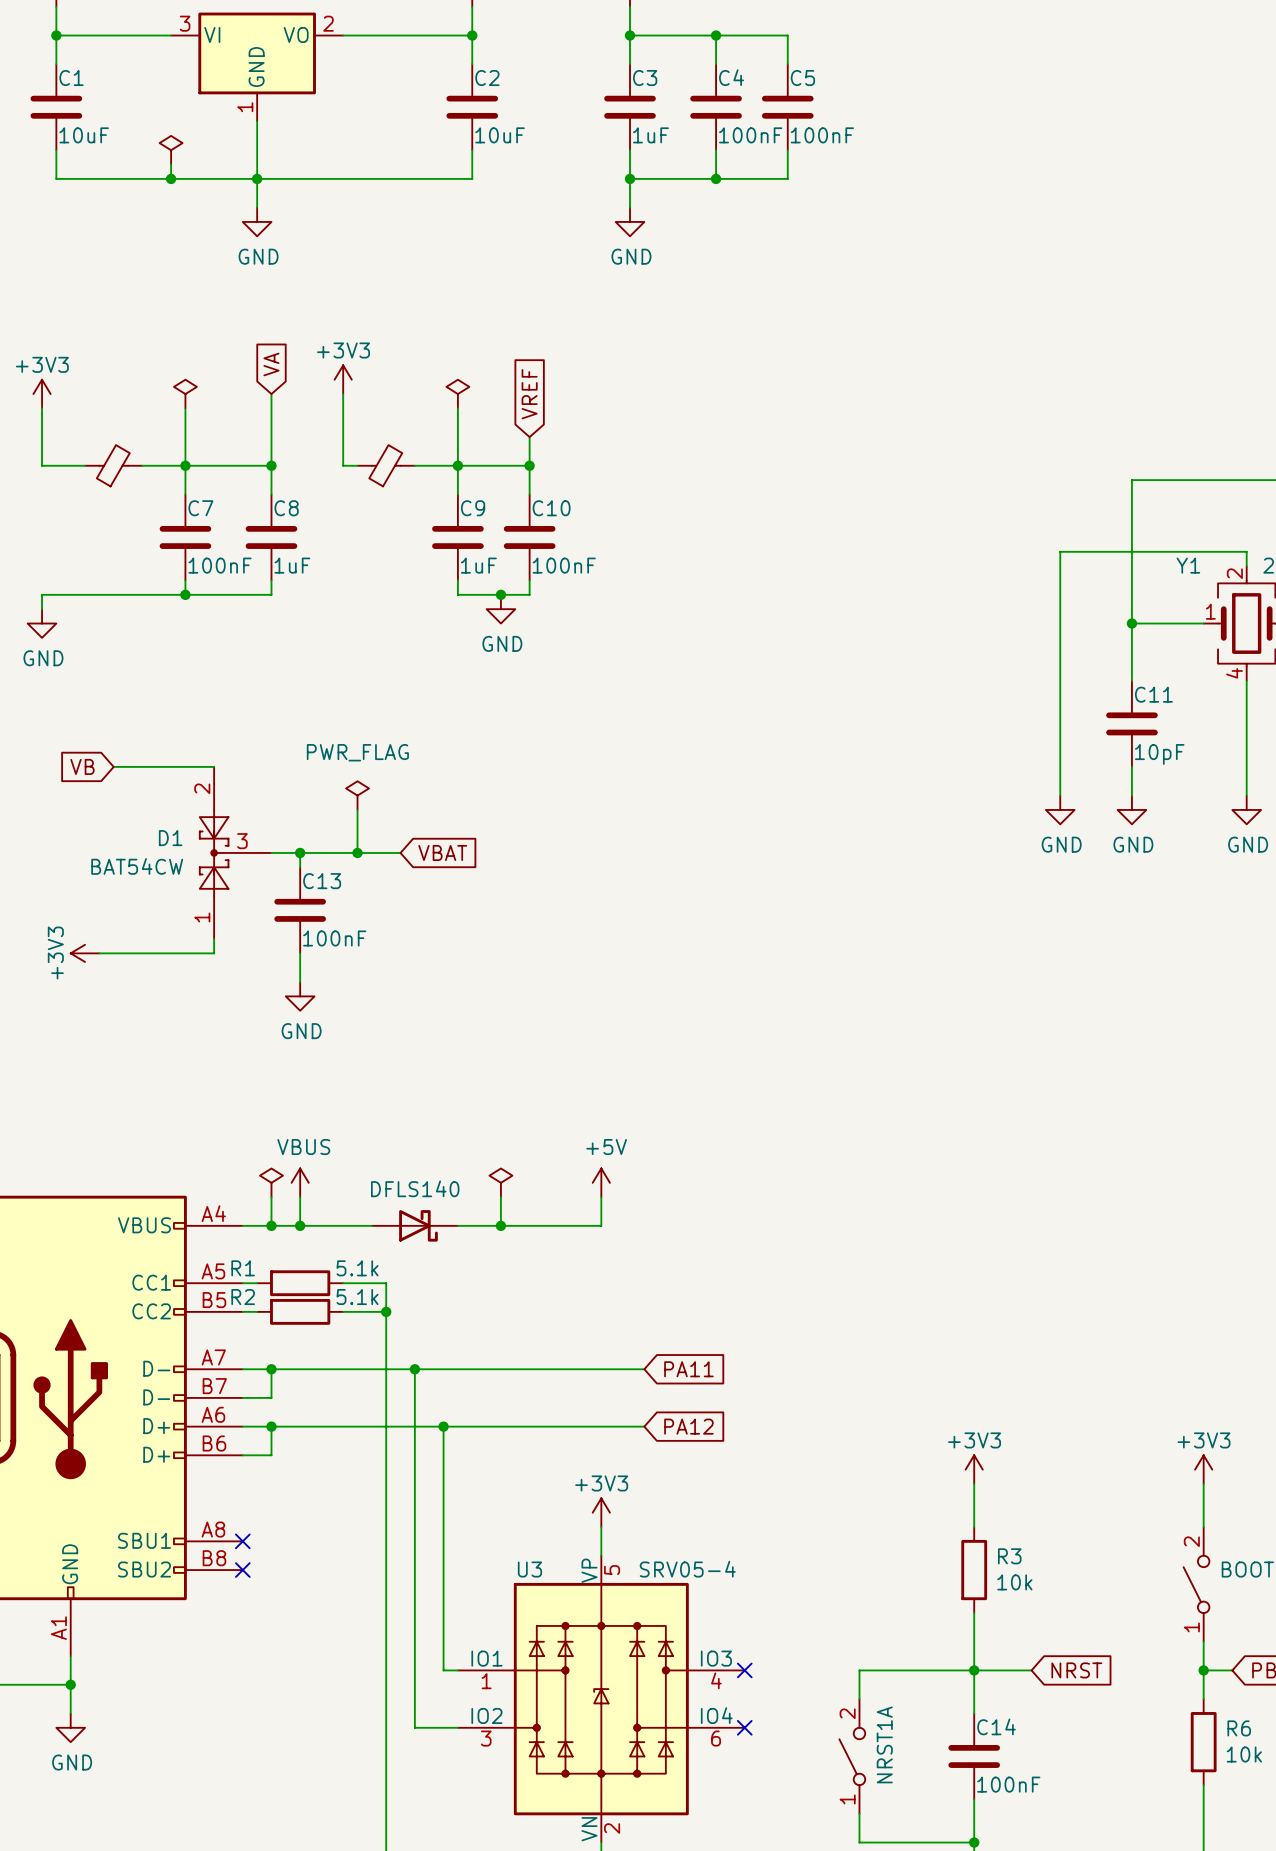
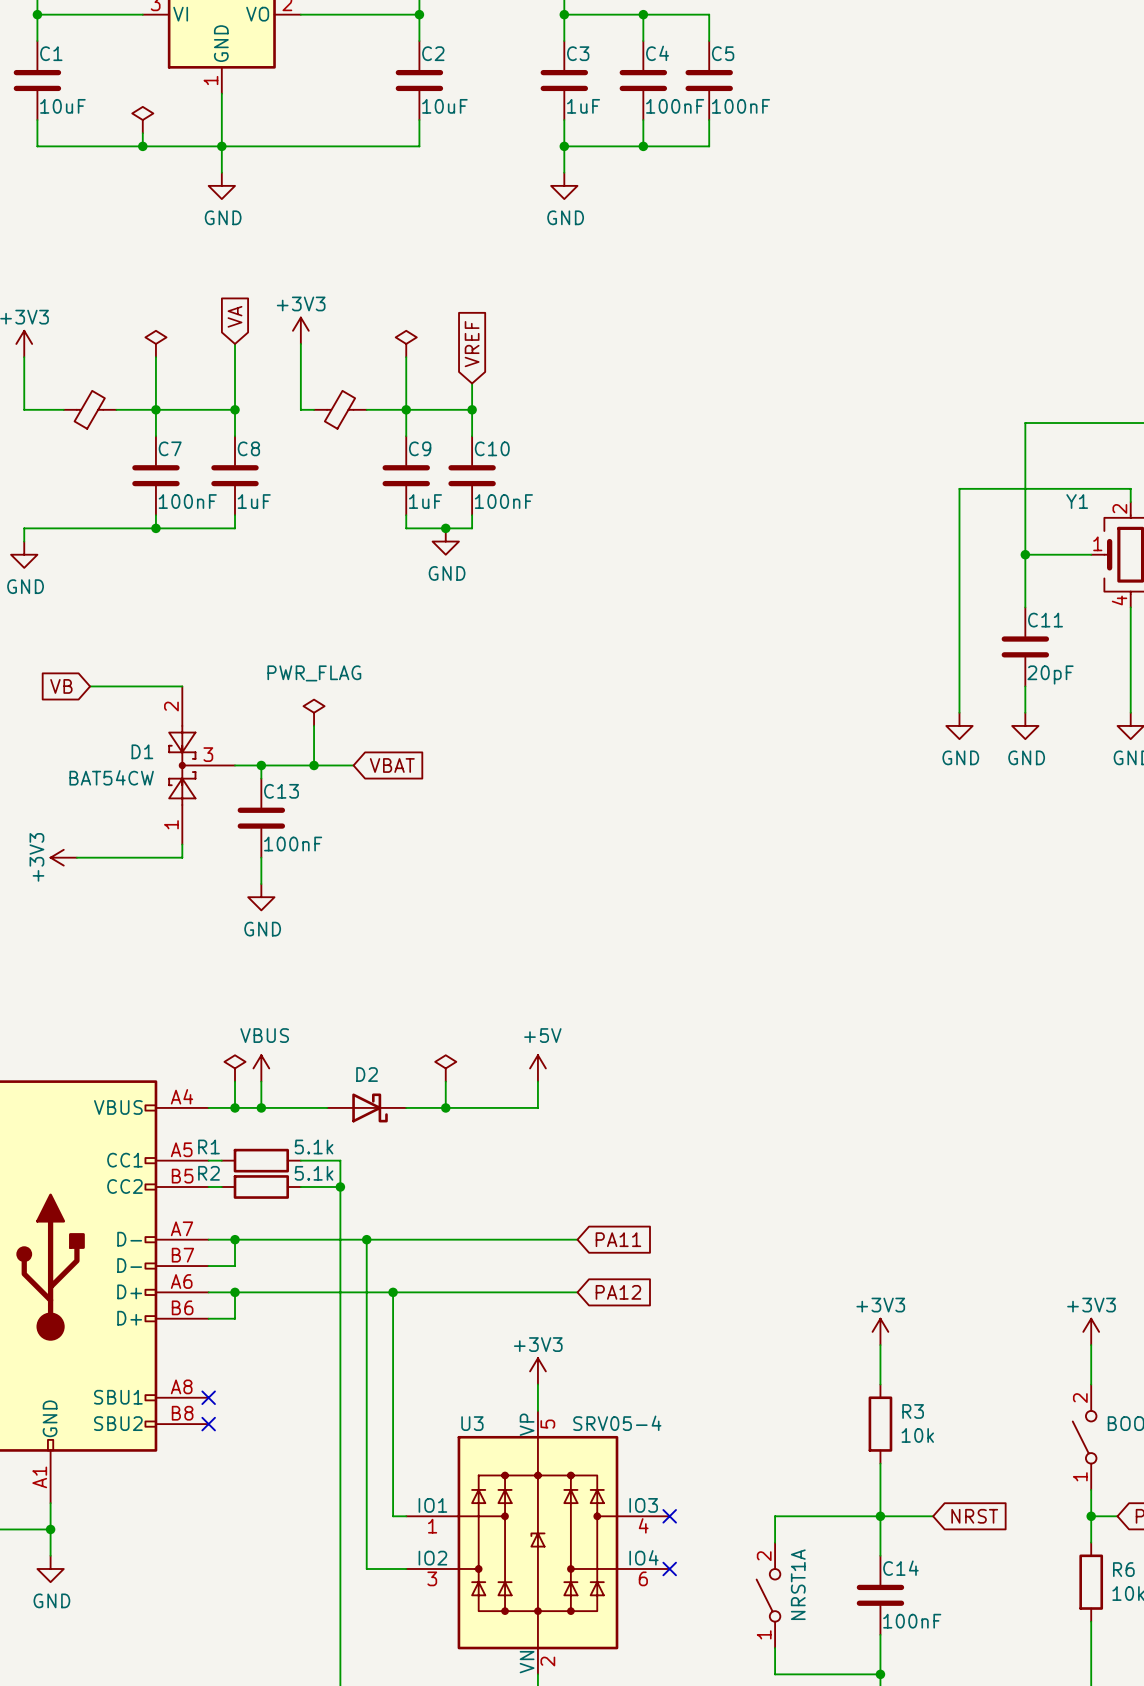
C11 text: 10pF (1159, 754) -> 20pF (1050, 674)
D2 value: DFLS140 (415, 1188) -> none
D2 name: none -> D2 (367, 1074)

